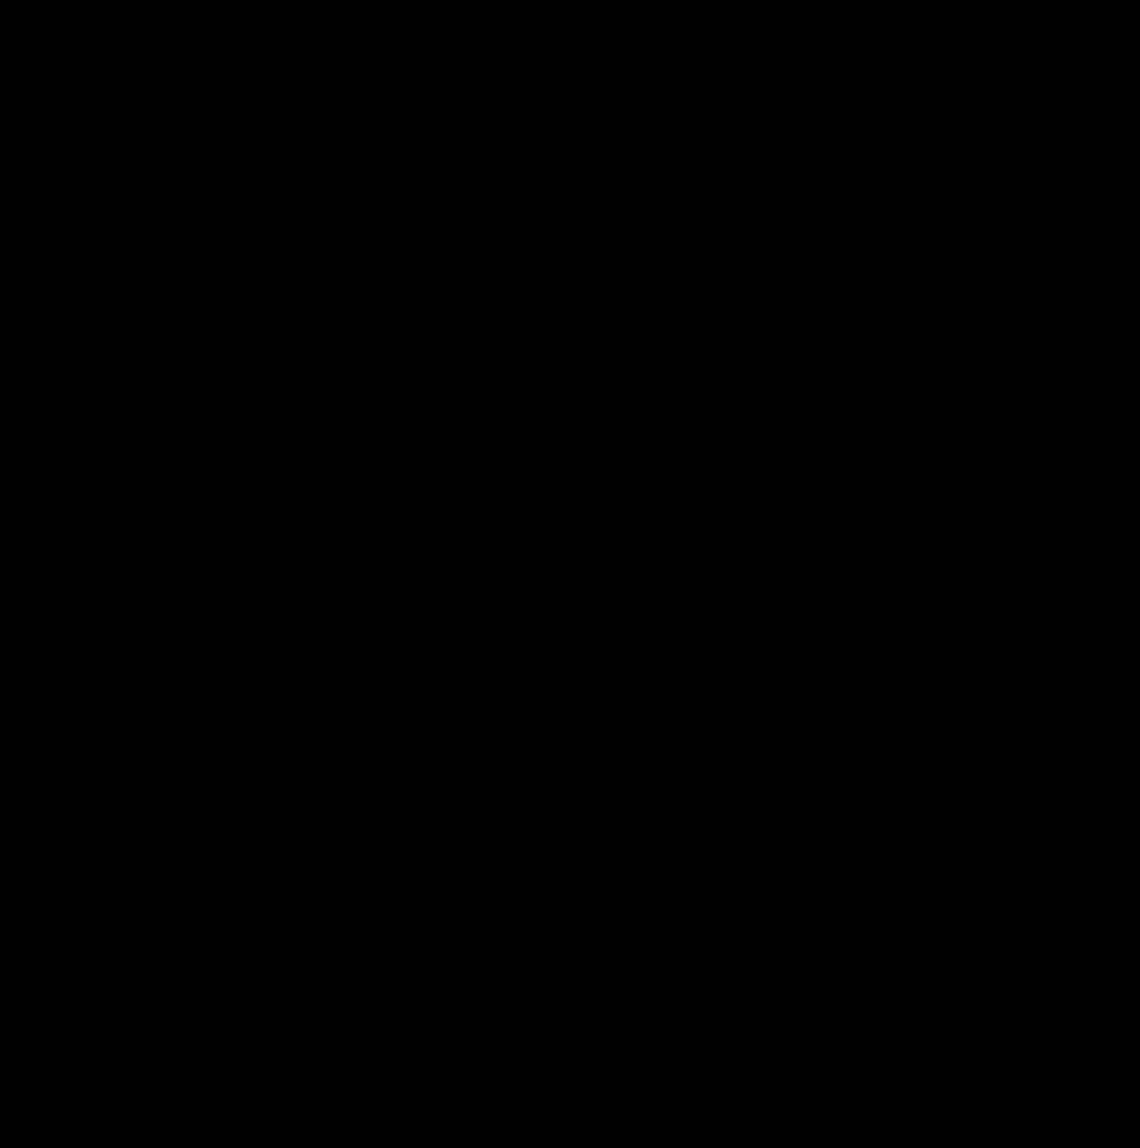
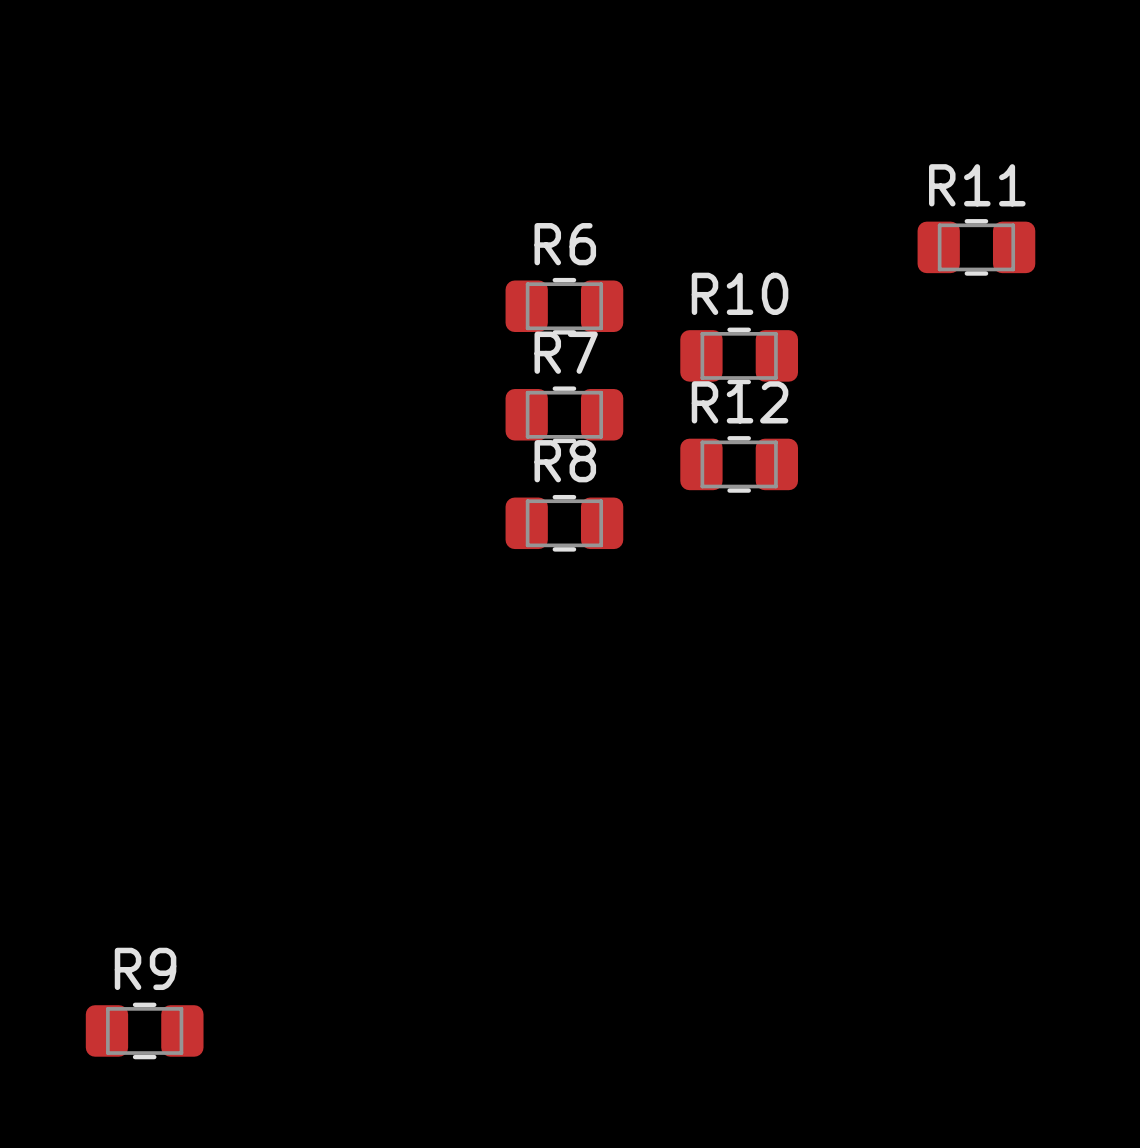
R11: none -> (976, 247)
R6: none -> (564, 306)
R10: none -> (739, 355)
R7: none -> (564, 414)
R12: none -> (739, 464)
R8: none -> (564, 523)
R9: none -> (144, 1030)

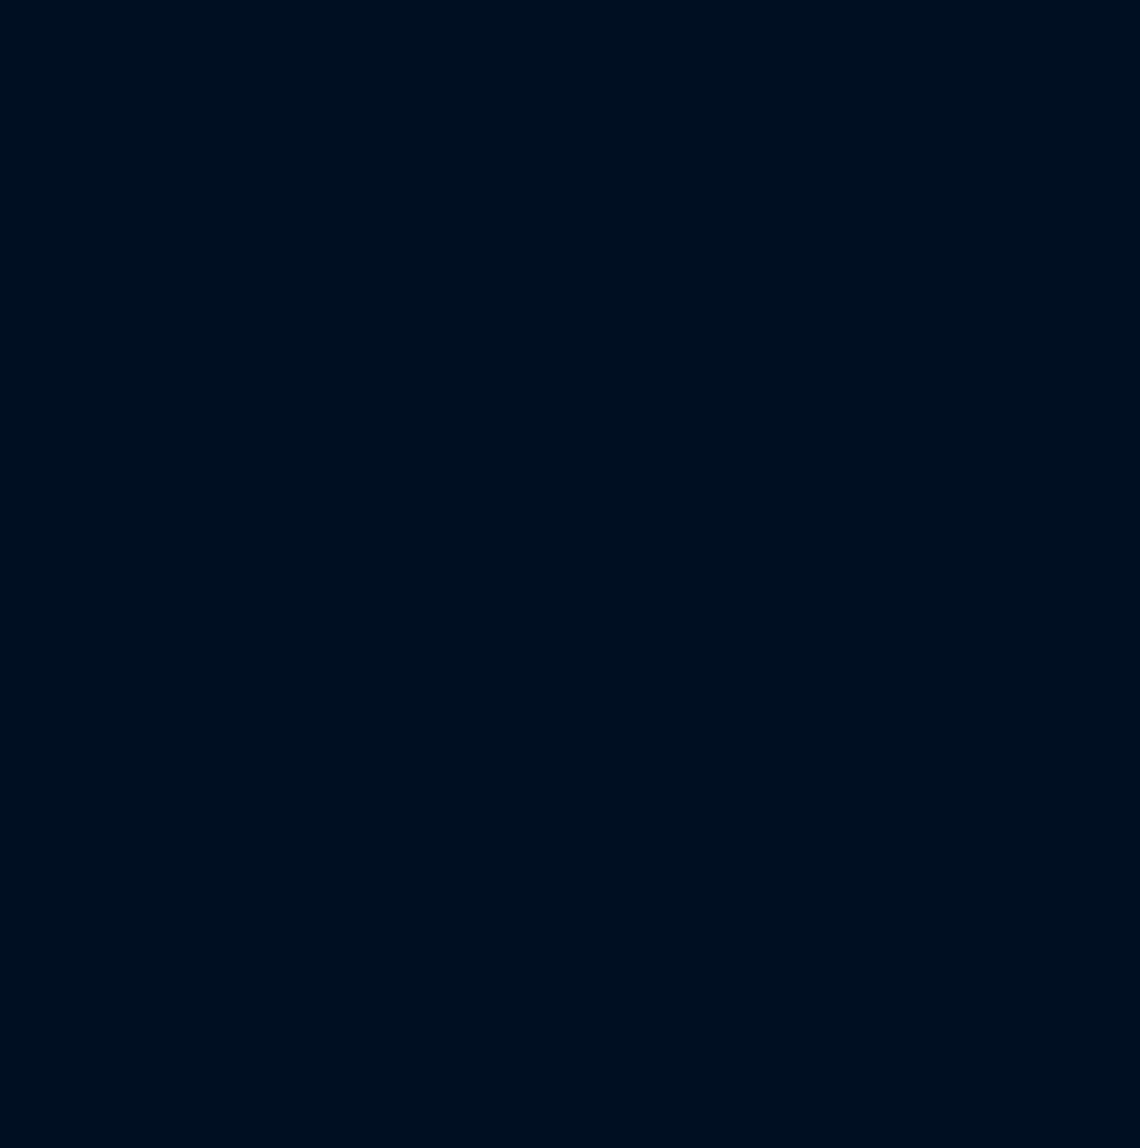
R11: (976, 247) -> none
R6: (564, 306) -> none
R10: (739, 355) -> none
R7: (564, 414) -> none
R12: (739, 464) -> none
R8: (564, 523) -> none
R9: (144, 1030) -> none

